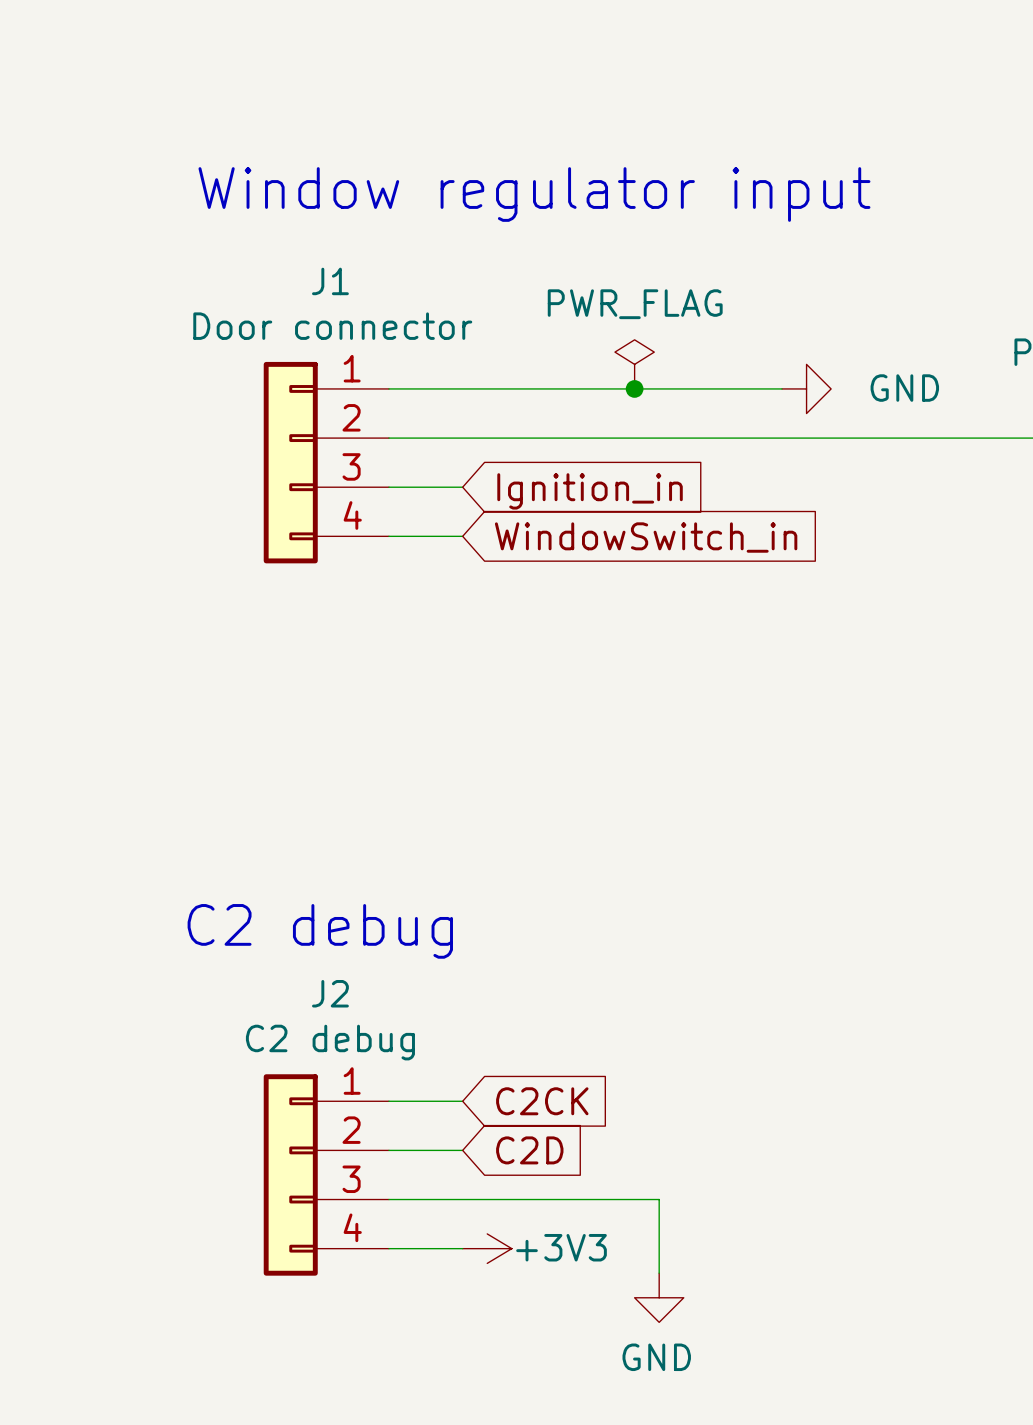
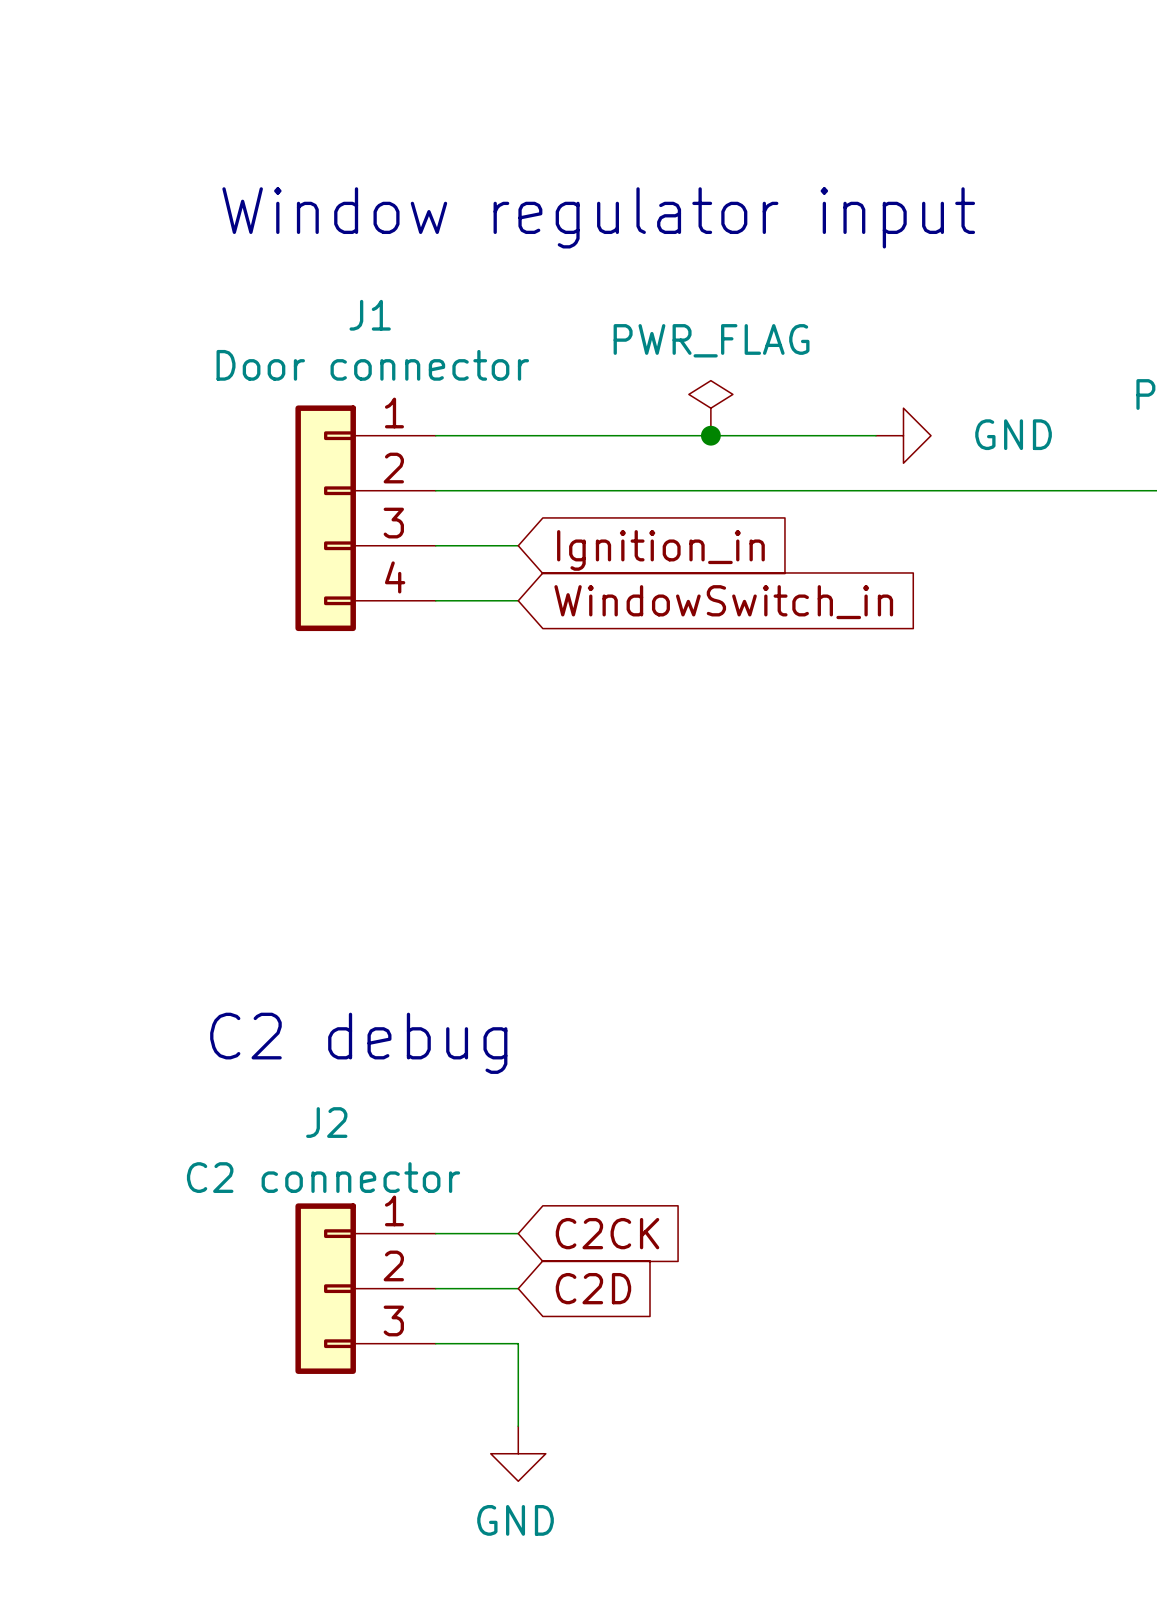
J2 name position: J2 (330, 993) -> J2 (326, 1122)
J2 value: C2 debug (330, 1042) -> C2 connector (323, 1177)
J2 symbol: [263, 1074, 389, 1276] -> [295, 1203, 436, 1374]
wire: (462, 1199) (659, 1199) (659, 1273) -> (518, 1343) (518, 1426)
wire: (388, 1248) (462, 1248) -> none
power symbol: +3V3 (487, 1248) -> none
power symbol position: GND (659, 1297) -> GND (518, 1453)

